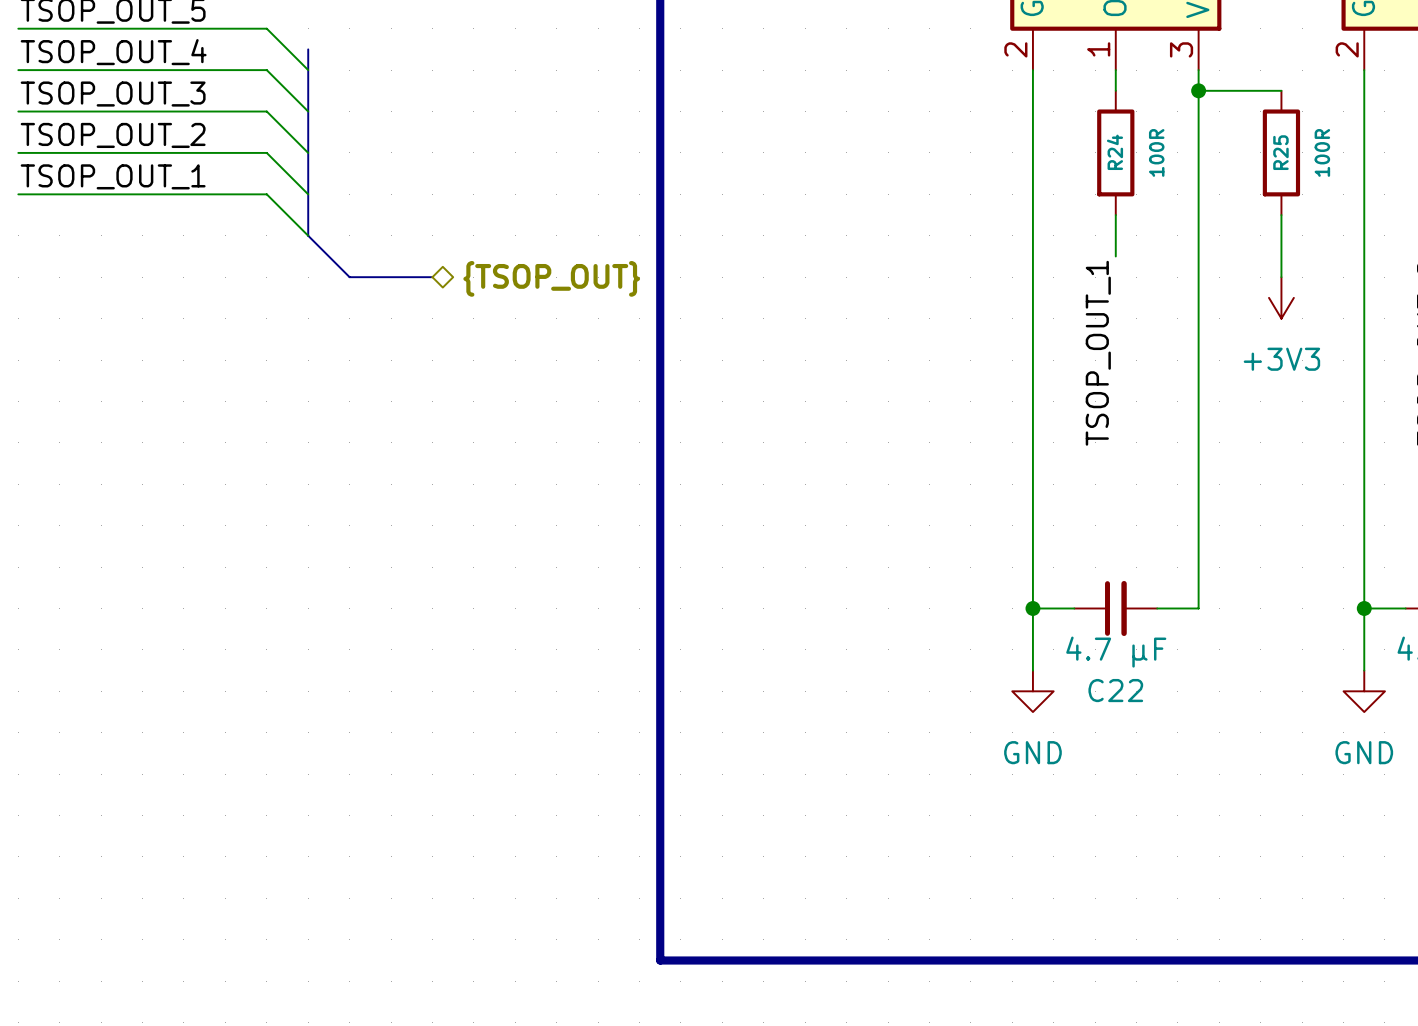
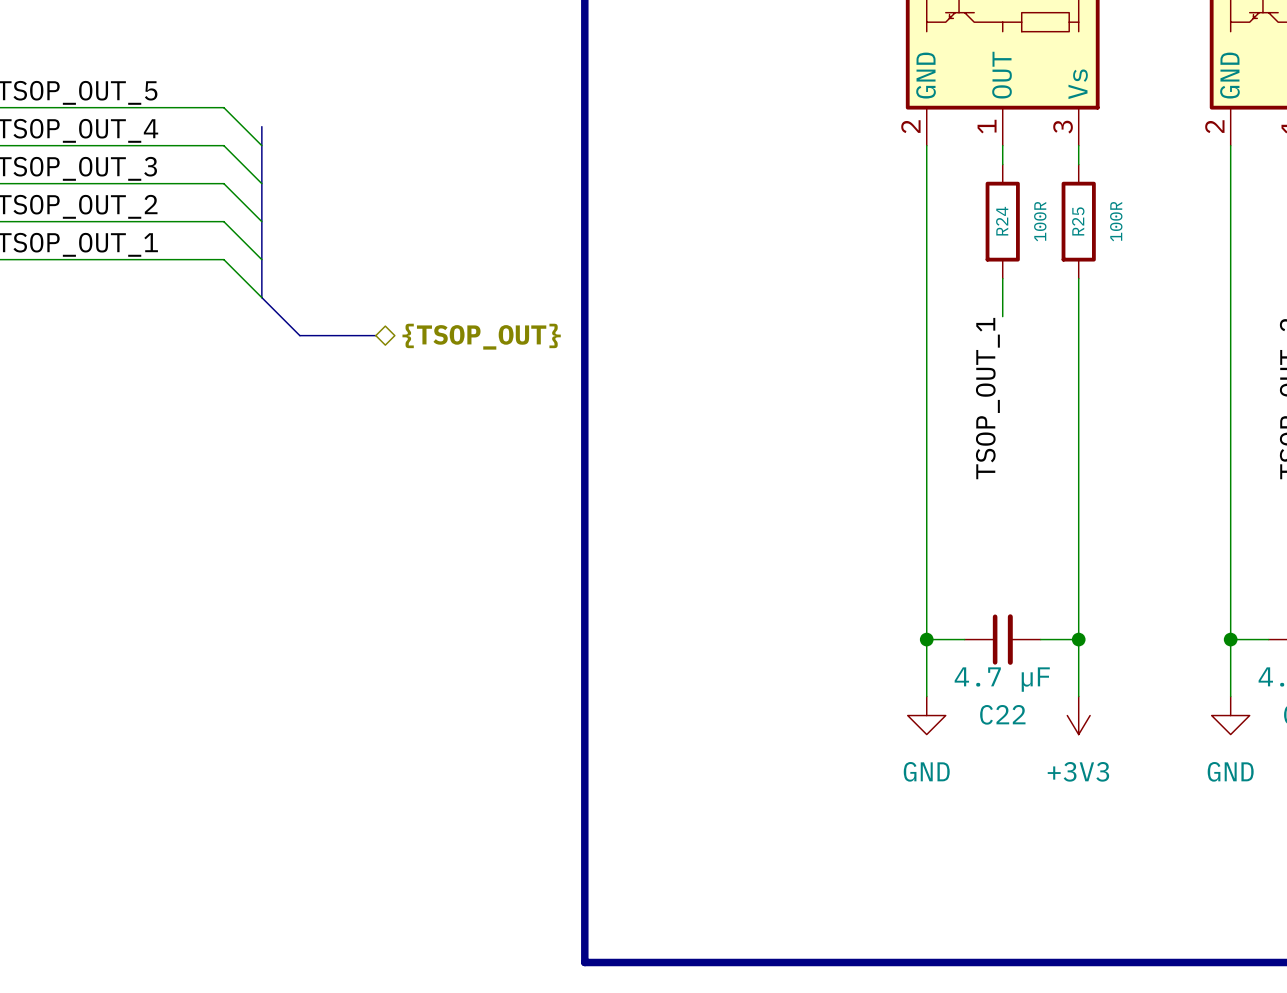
junction: (1198, 90) -> none
wire: (1281, 90) (1198, 90) (1198, 215) -> none
R25 position: (1281, 152) -> (1078, 221)
wire: (1281, 215) (1281, 277) -> (1078, 639) (1078, 696)
power symbol position: +3V3 (1281, 297) -> +3V3 (1078, 715)
junction: none -> (1078, 639)

